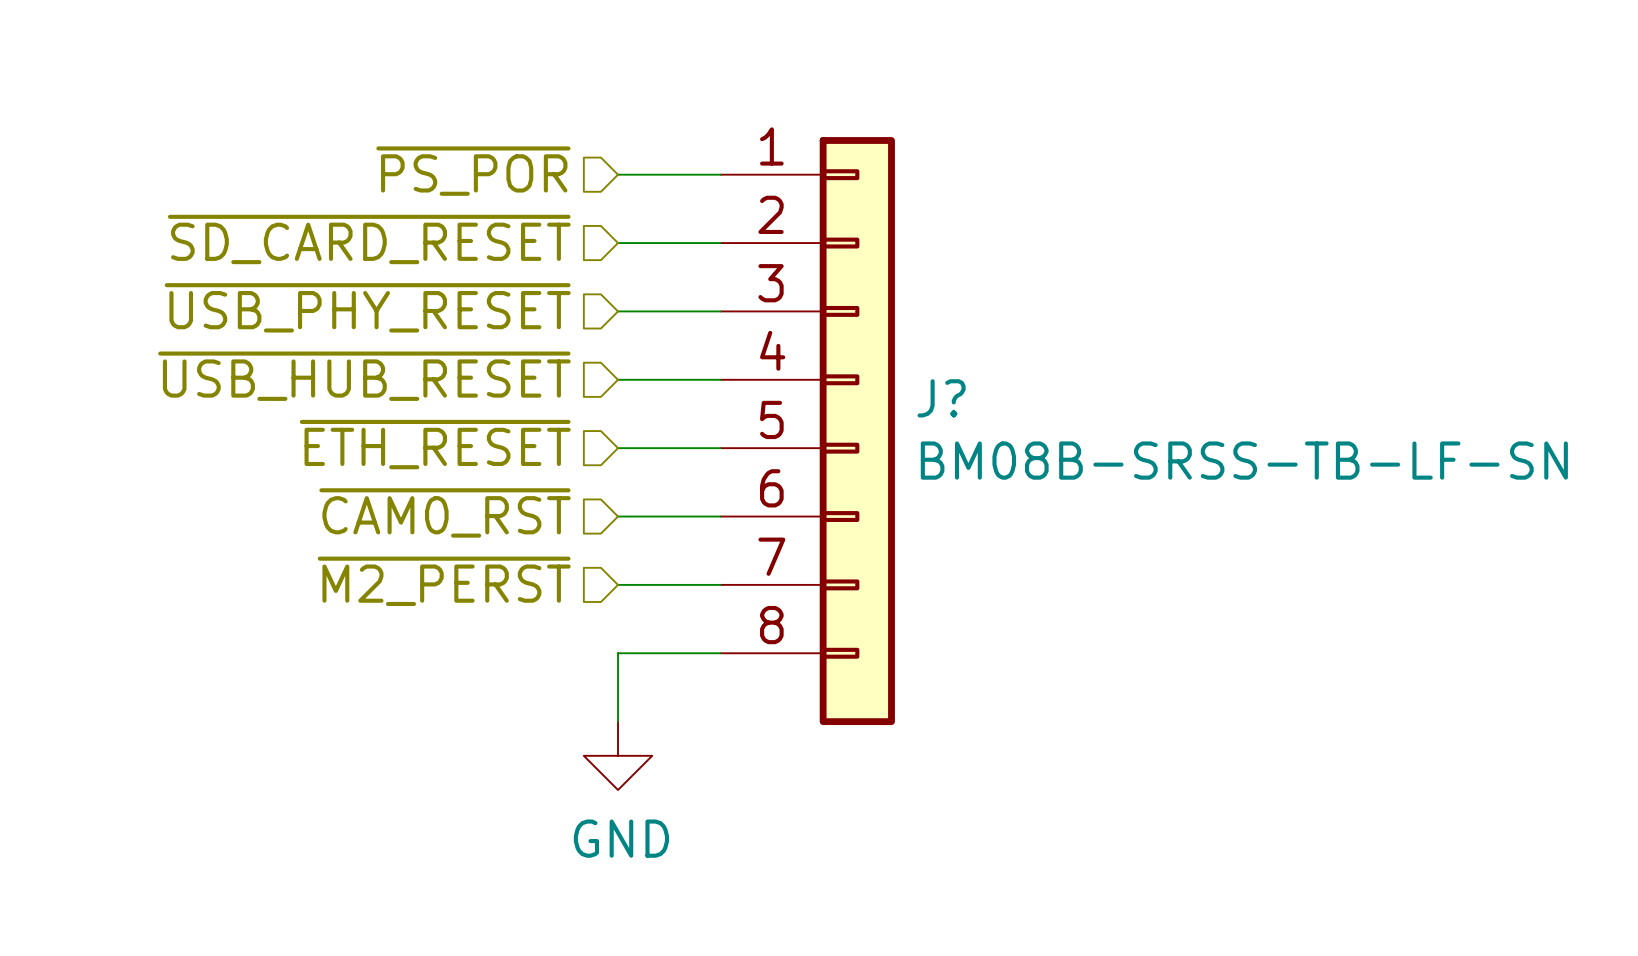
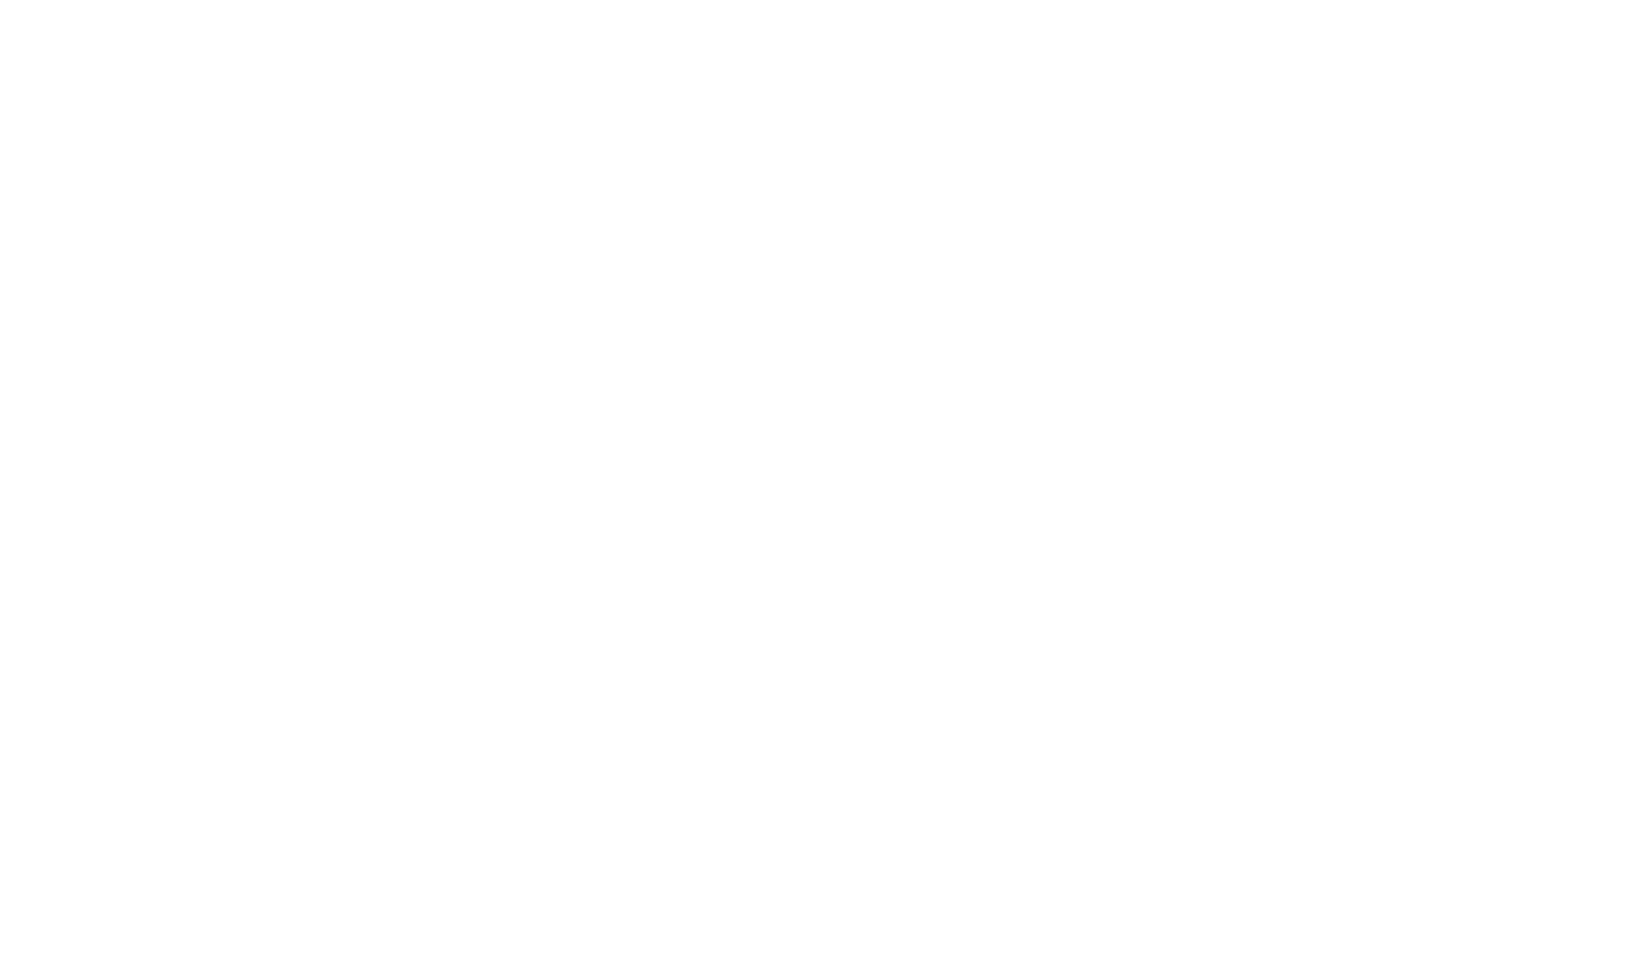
hierarchical label: ~{PS_POR} (473, 171) -> none
wire: (618, 174) (720, 174) -> none
hierarchical label: ~{SD_CARD_RESET} (369, 239) -> none
wire: (618, 243) (720, 243) -> none
hierarchical label: ~{USB_PHY_RESET} (367, 307) -> none
wire: (618, 311) (720, 311) -> none
hierarchical label: ~{USB_HUB_RESET} (364, 376) -> none
wire: (618, 379) (720, 379) -> none
J?: BM08B-SRSS-TB-LF-SN (807, 431) -> none
hierarchical label: ~{ETH_RESET} (435, 444) -> none
wire: (618, 448) (720, 448) -> none
hierarchical label: ~{CAM0_RST} (445, 512) -> none
wire: (618, 516) (720, 516) -> none
hierarchical label: ~{M2_PERST} (444, 581) -> none
wire: (618, 584) (720, 584) -> none
wire: (720, 653) (618, 653) (618, 721) -> none
power symbol: GND (618, 755) -> none

